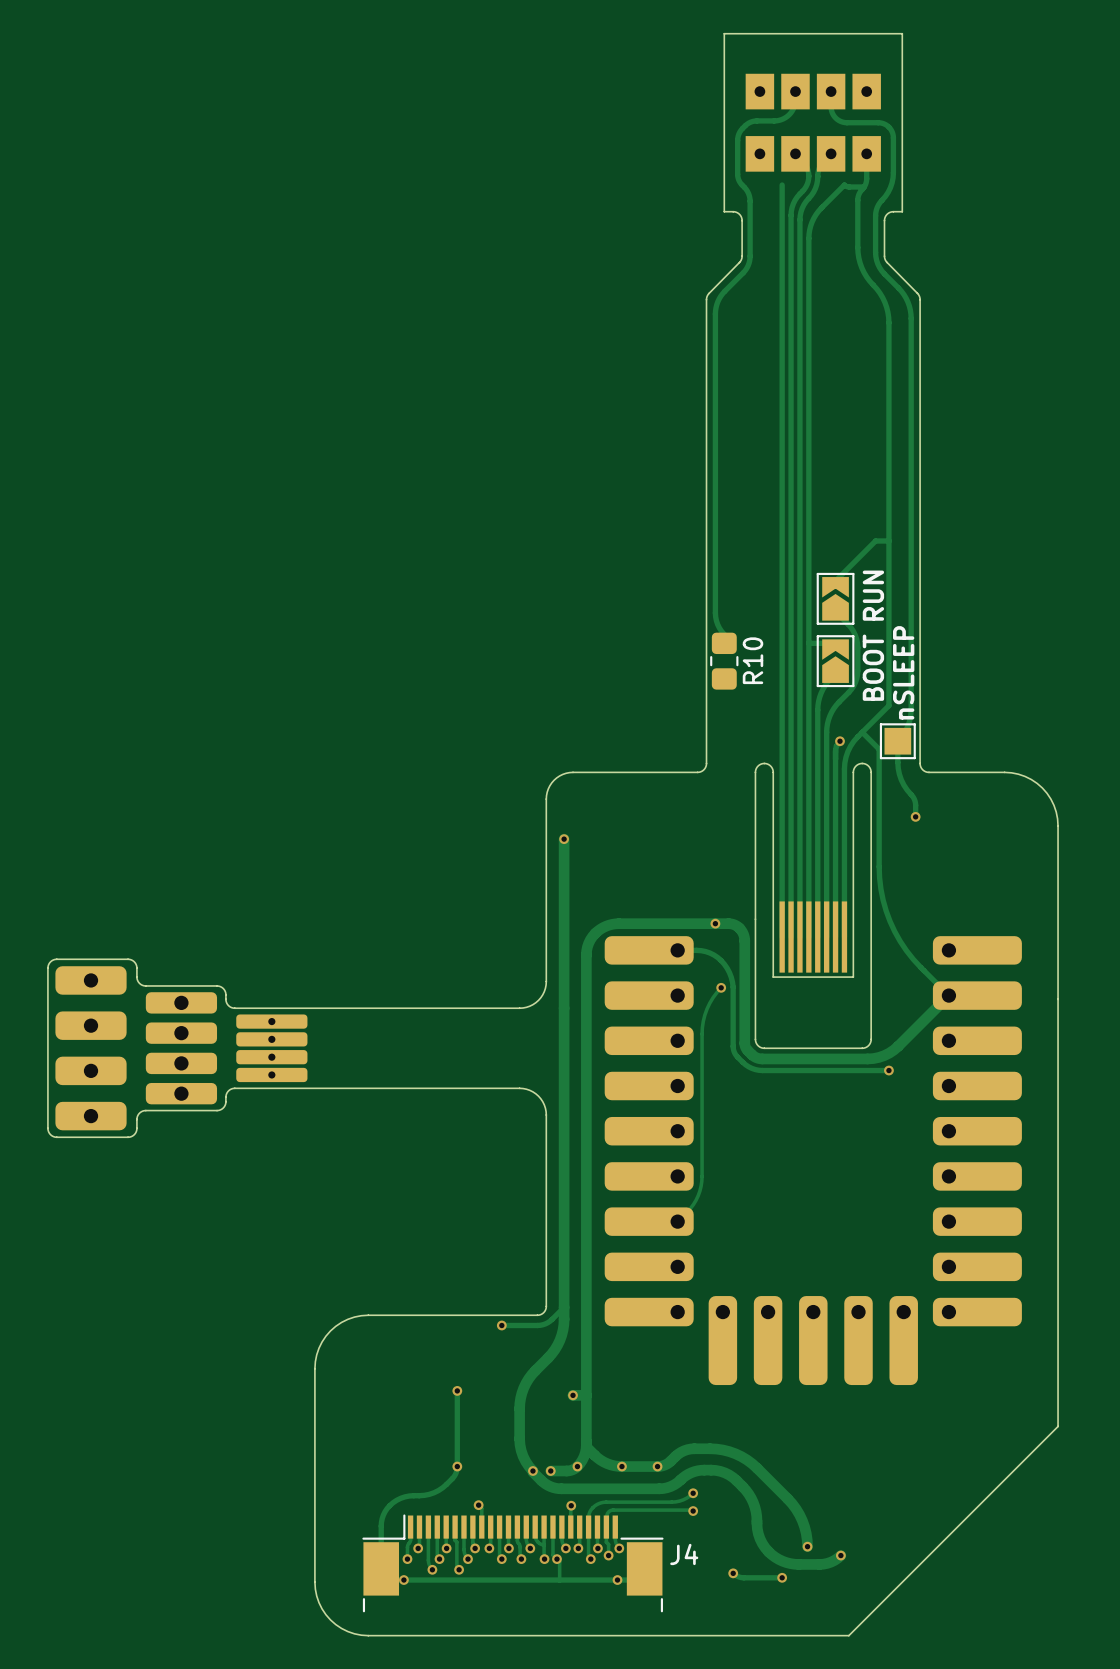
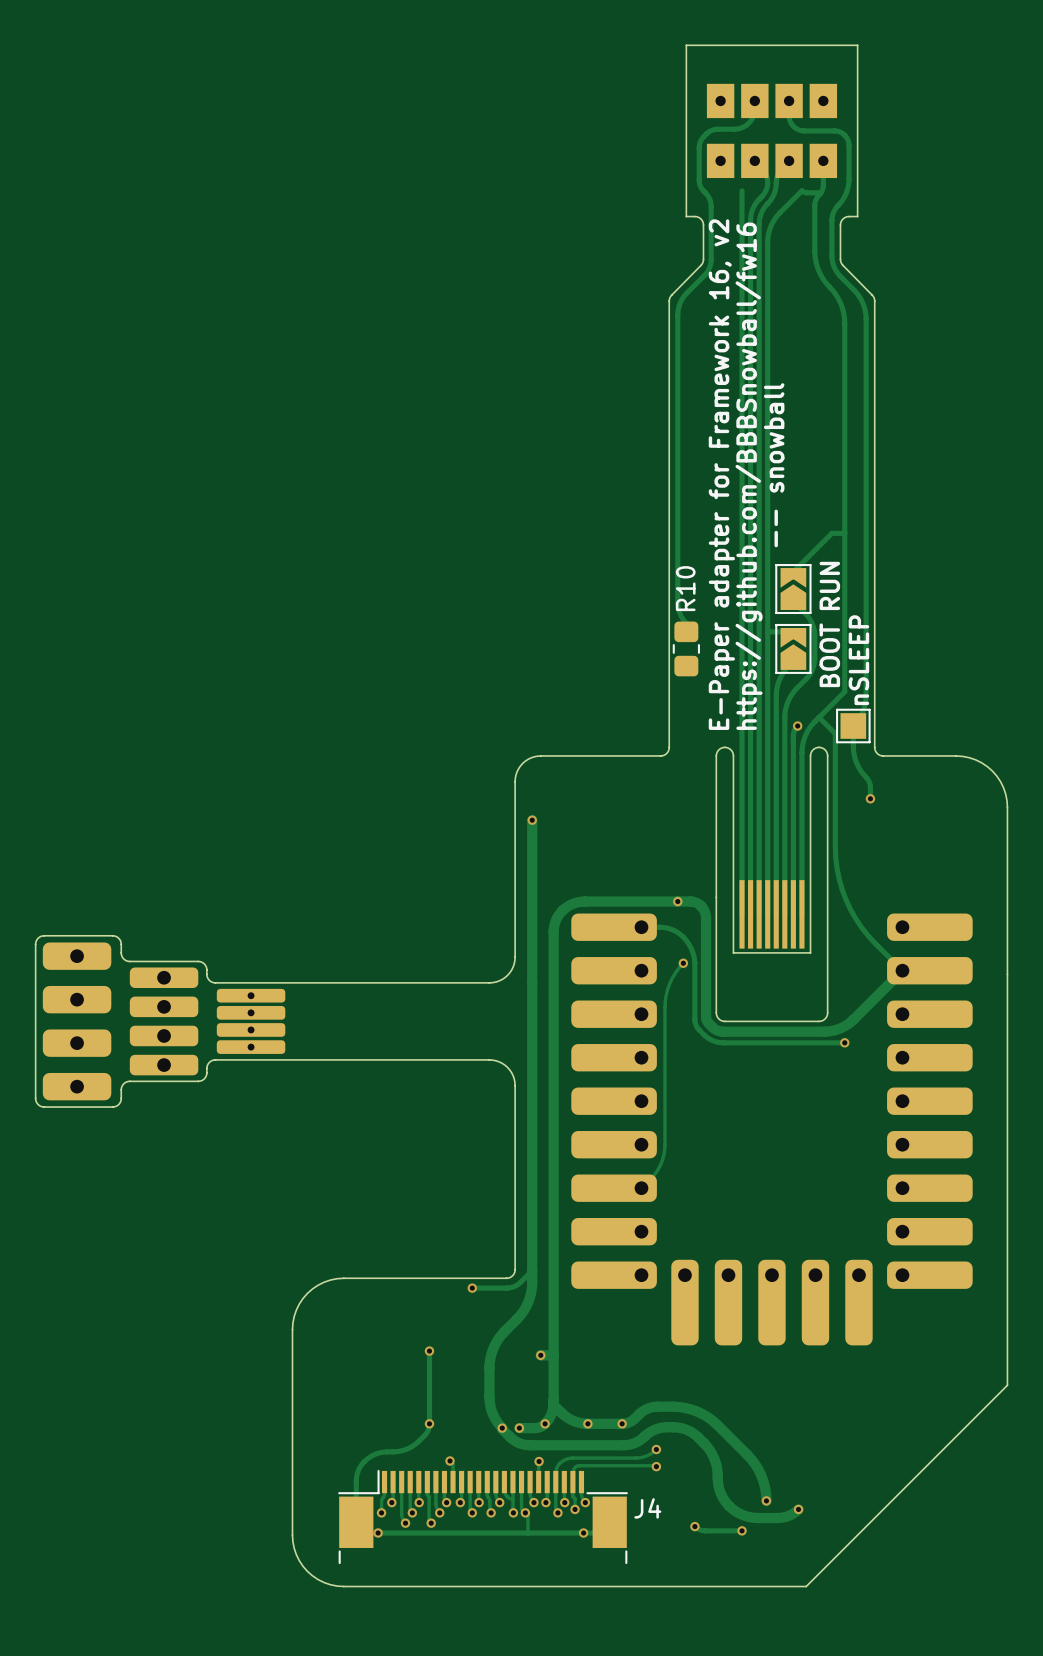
text: none -> -- snowball (774, 465)
text: none -> E-Paper adapter for Framework 16, v2 (721, 474)
text: none -> https://github.com/BBBSnowball/fw16 (749, 476)
R10 name position: R10 (753, 660) -> R10 (685, 588)

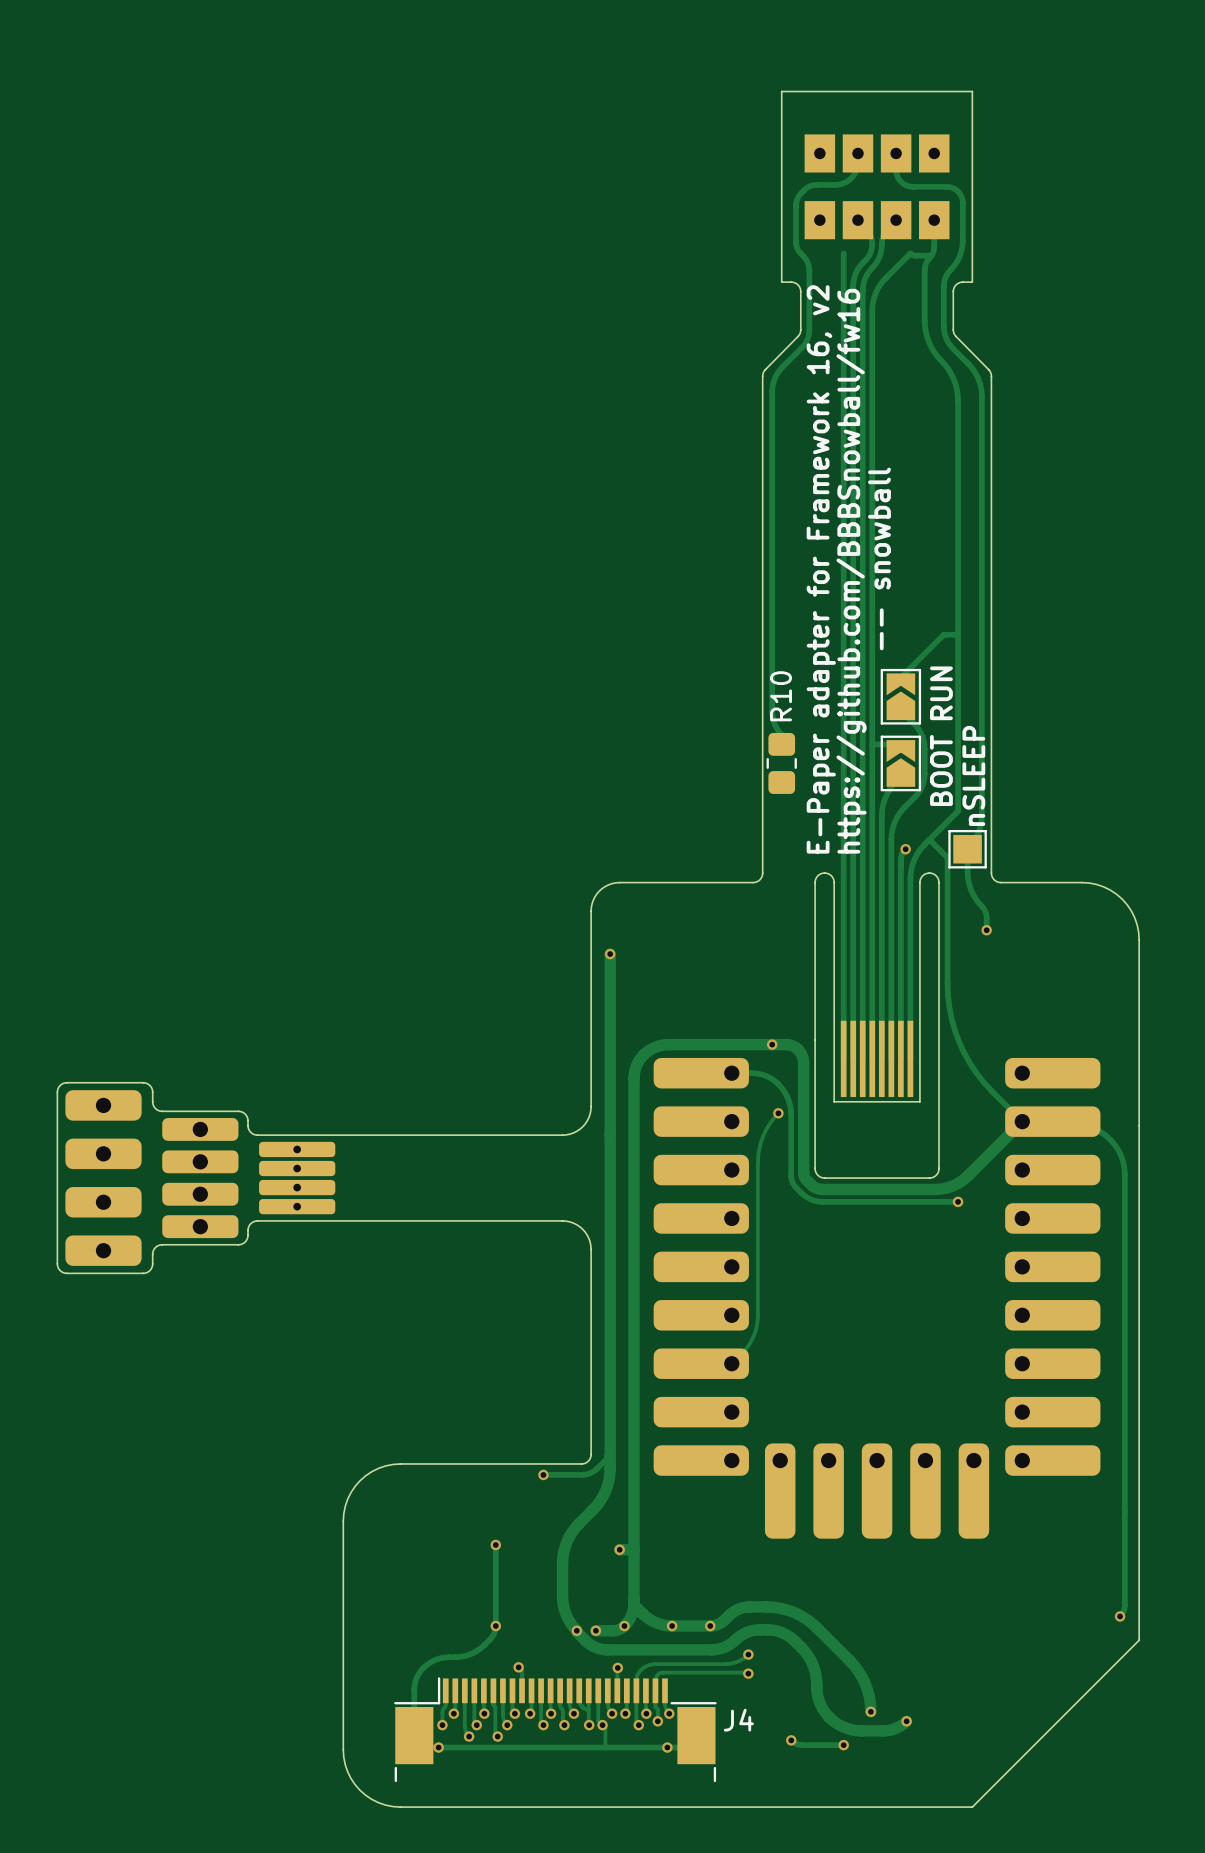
track: none -> (1022, 1121) (1074, 1122) (1090, 1126) (1104, 1134) (1114, 1144) (1121, 1155) (1124, 1168) (1124, 1604) (1120, 1616)
board edge: (1007, 1385) (806, 1586) -> (1139, 1583) (1139, 1640) (972, 1807) (915, 1807)
via: none -> (1120, 1616)

